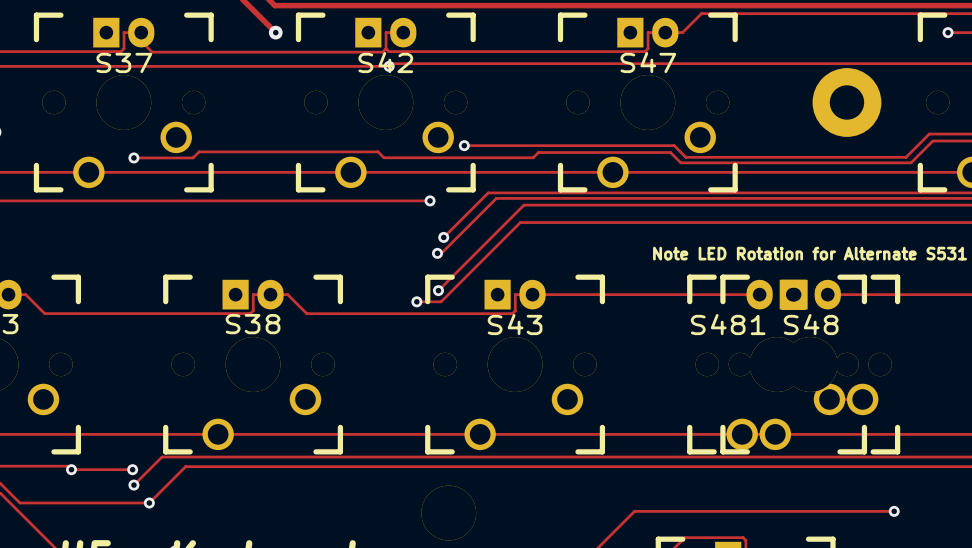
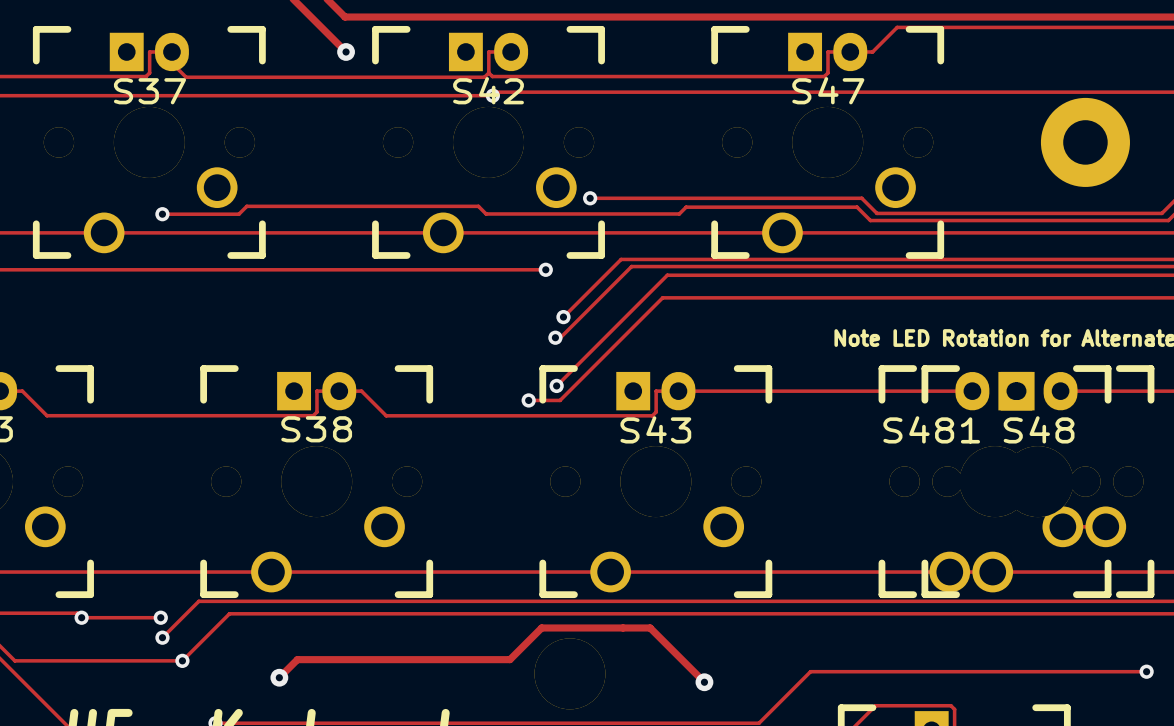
track: none -> (279, 677) (297, 659) (509, 659) (541, 627) (650, 627) (704, 682)
via: none -> (279, 677)
via: none -> (704, 682)

